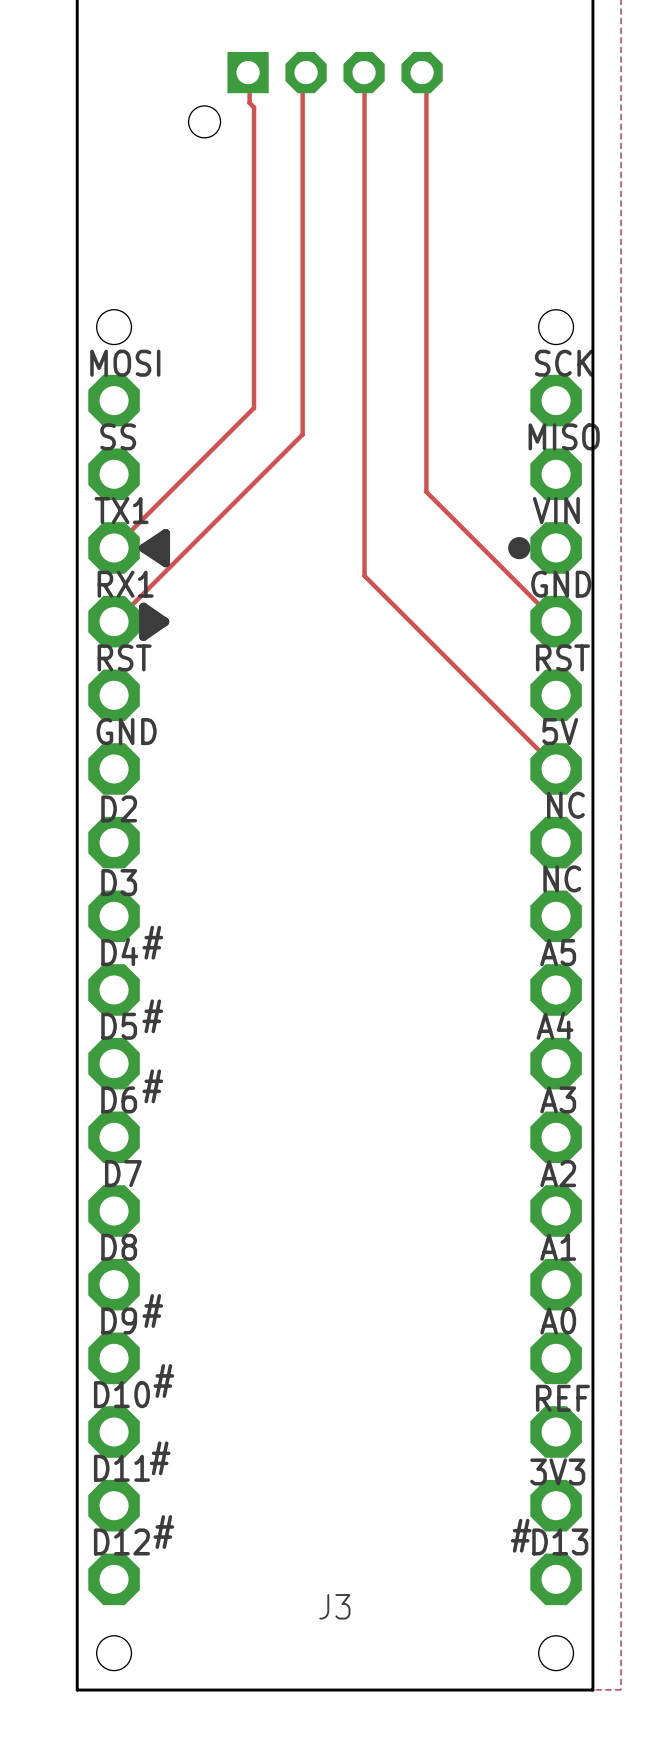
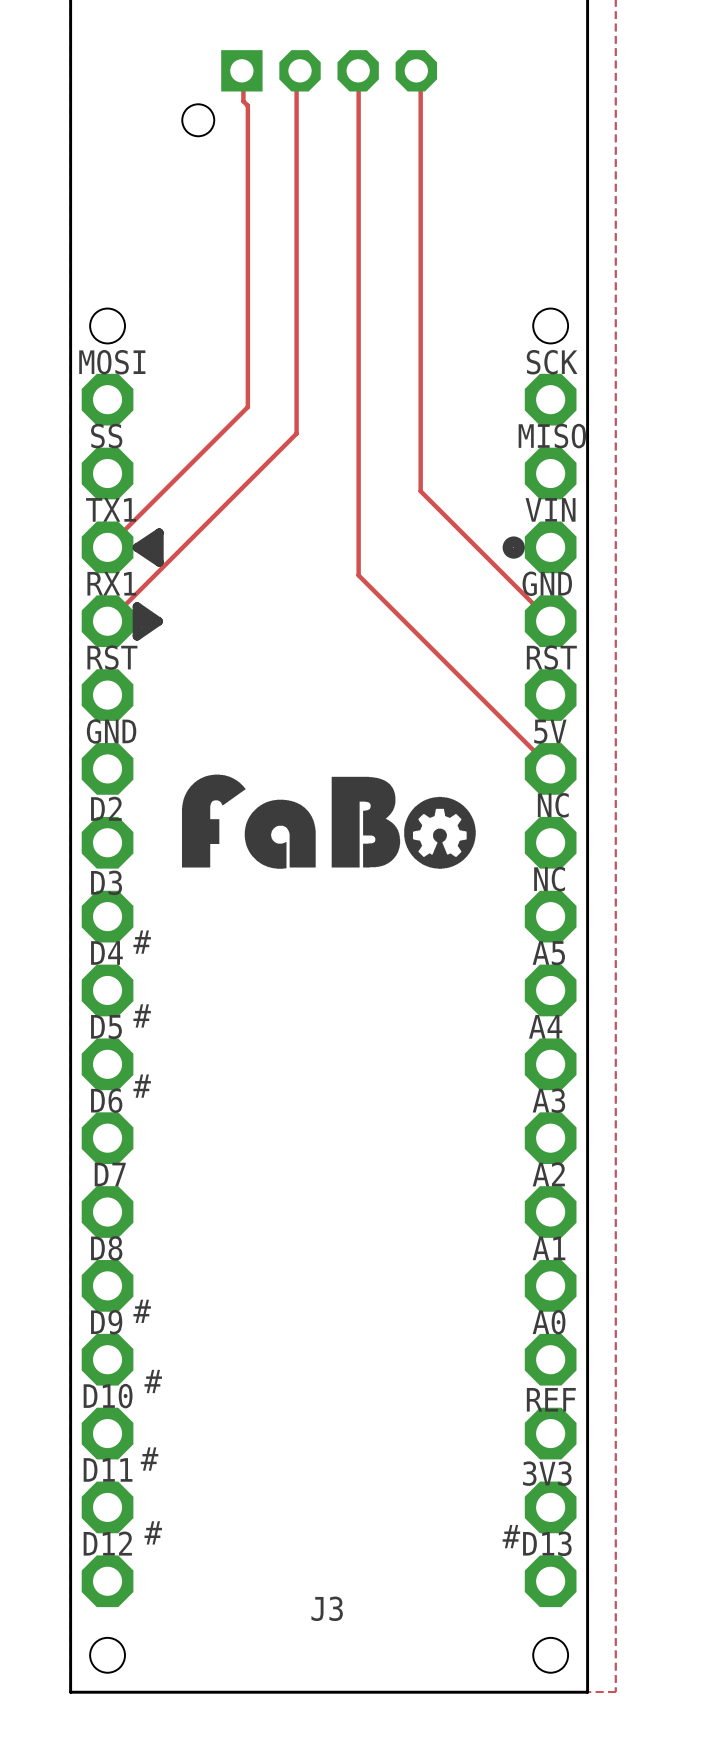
drawing: none -> [181, 774, 476, 869]

